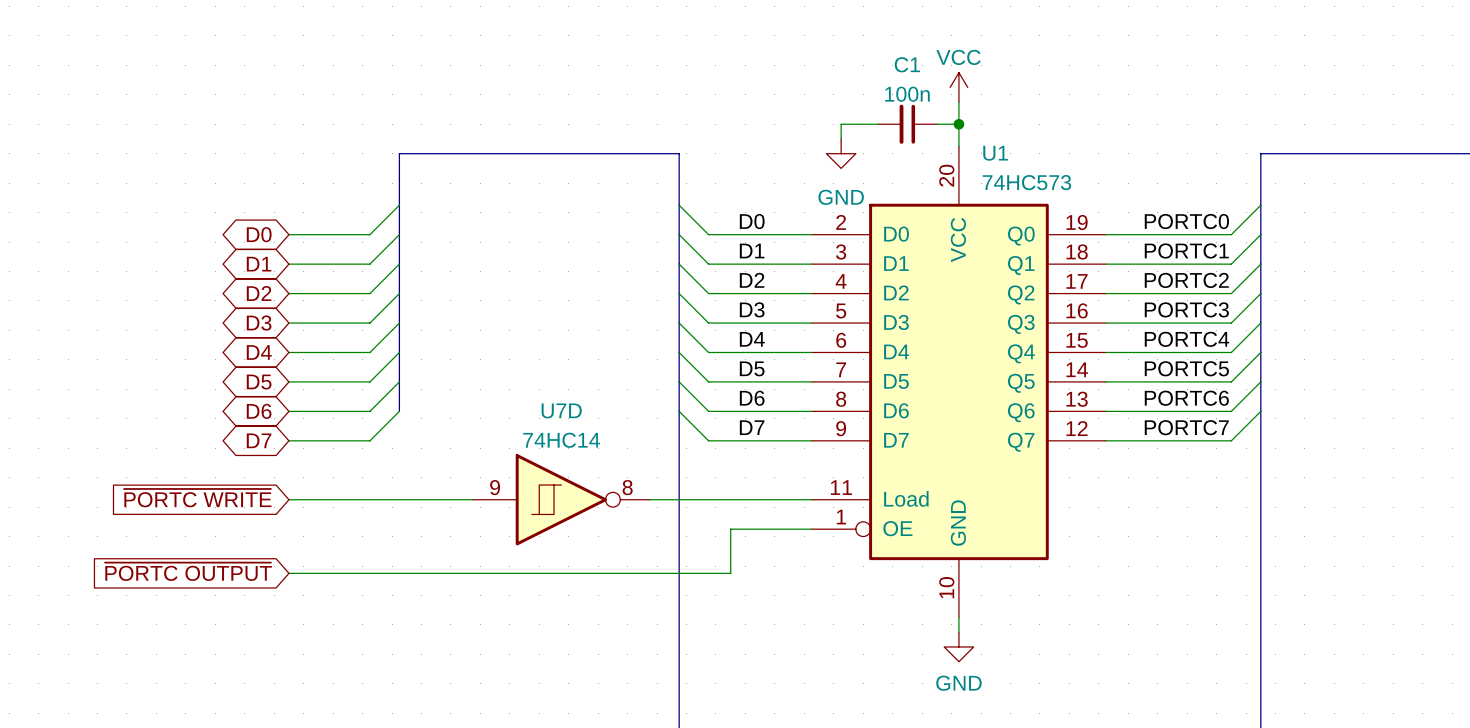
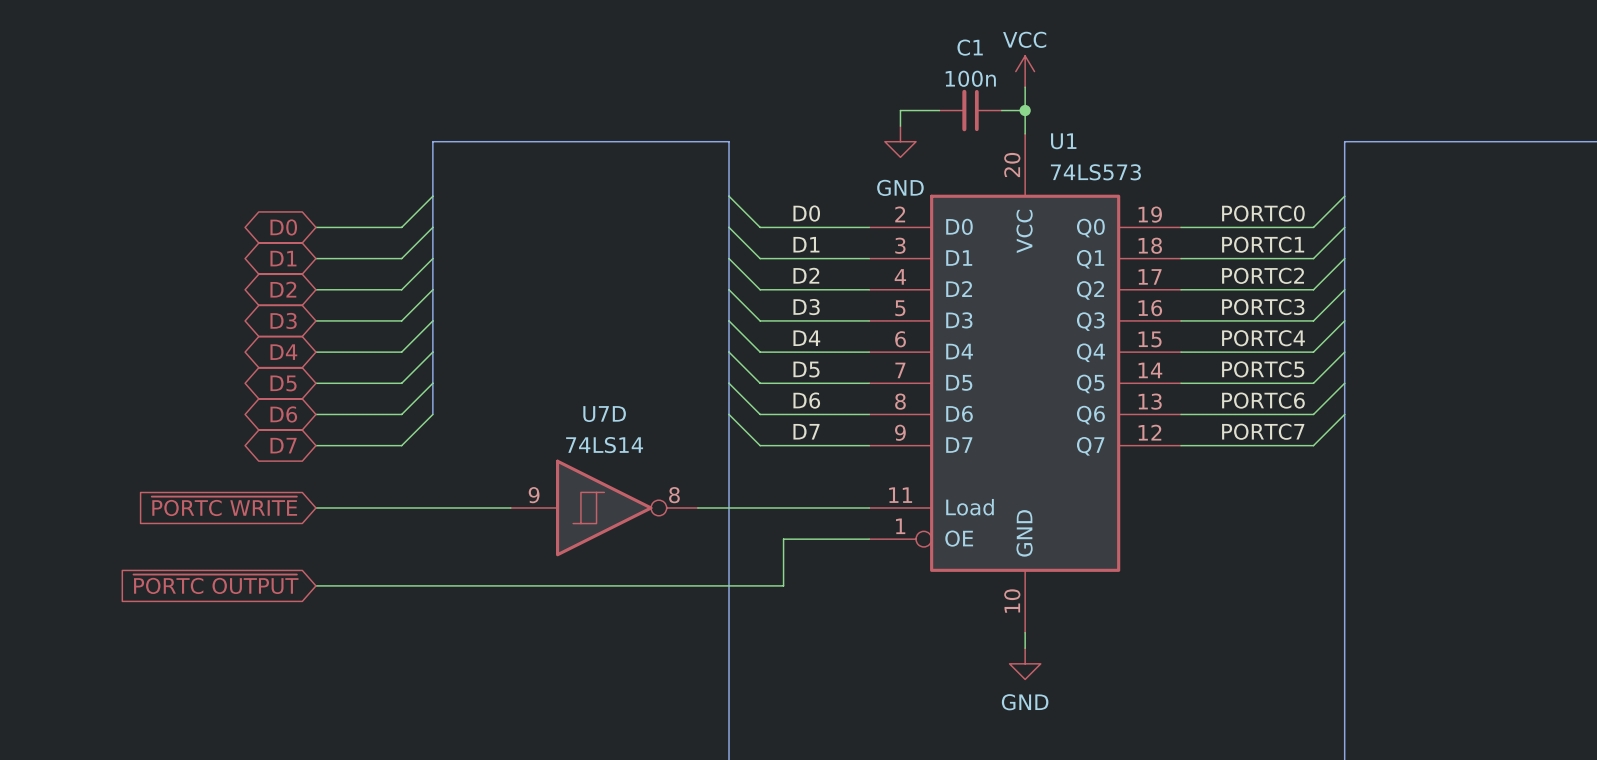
U1 value: 74HC573 (1026, 182) -> 74LS573 (1095, 172)
U7D value: 74HC14 (561, 440) -> 74LS14 (604, 445)

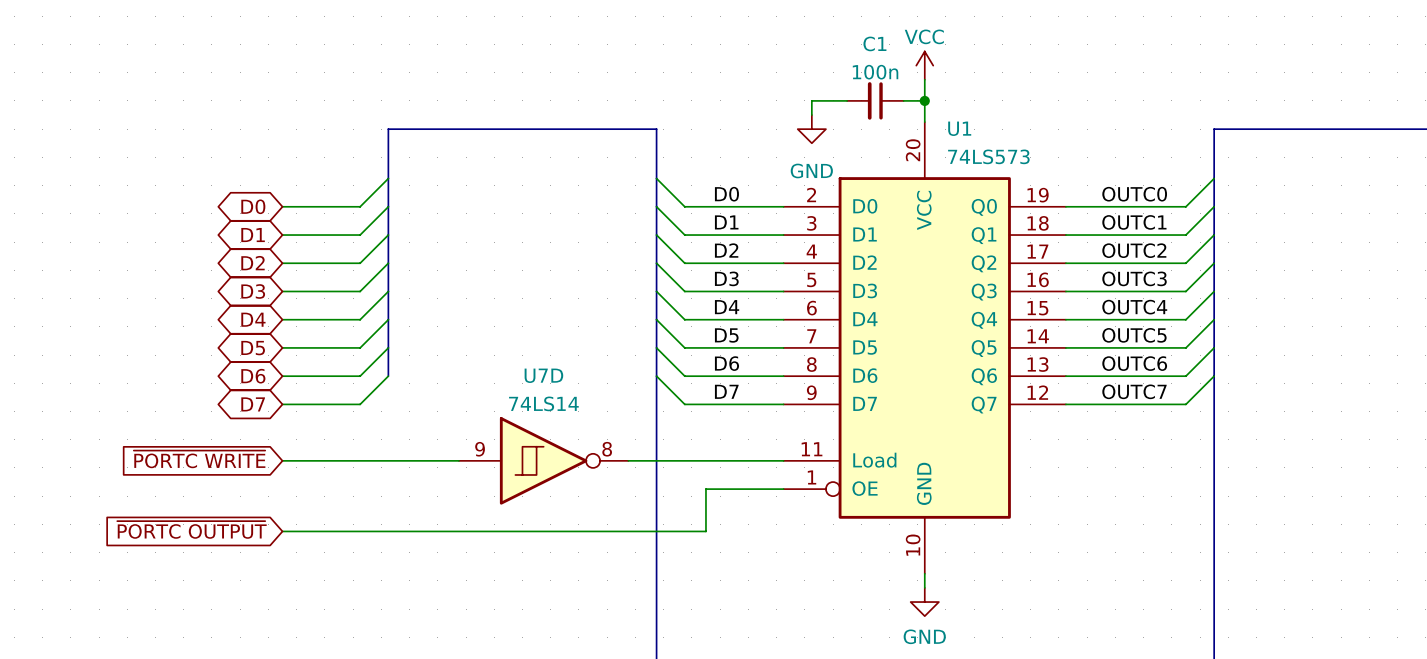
label: PORTC0 (1263, 213) -> OUTC0 (1134, 194)
label: PORTC1 (1263, 244) -> OUTC1 (1134, 222)
label: PORTC2 (1263, 275) -> OUTC2 (1134, 250)
label: PORTC3 (1263, 307) -> OUTC3 (1134, 278)
label: PORTC4 (1263, 338) -> OUTC4 (1134, 307)
label: PORTC5 (1263, 369) -> OUTC5 (1134, 335)
label: PORTC6 (1263, 400) -> OUTC6 (1134, 363)
label: PORTC7 (1263, 431) -> OUTC7 (1134, 391)

